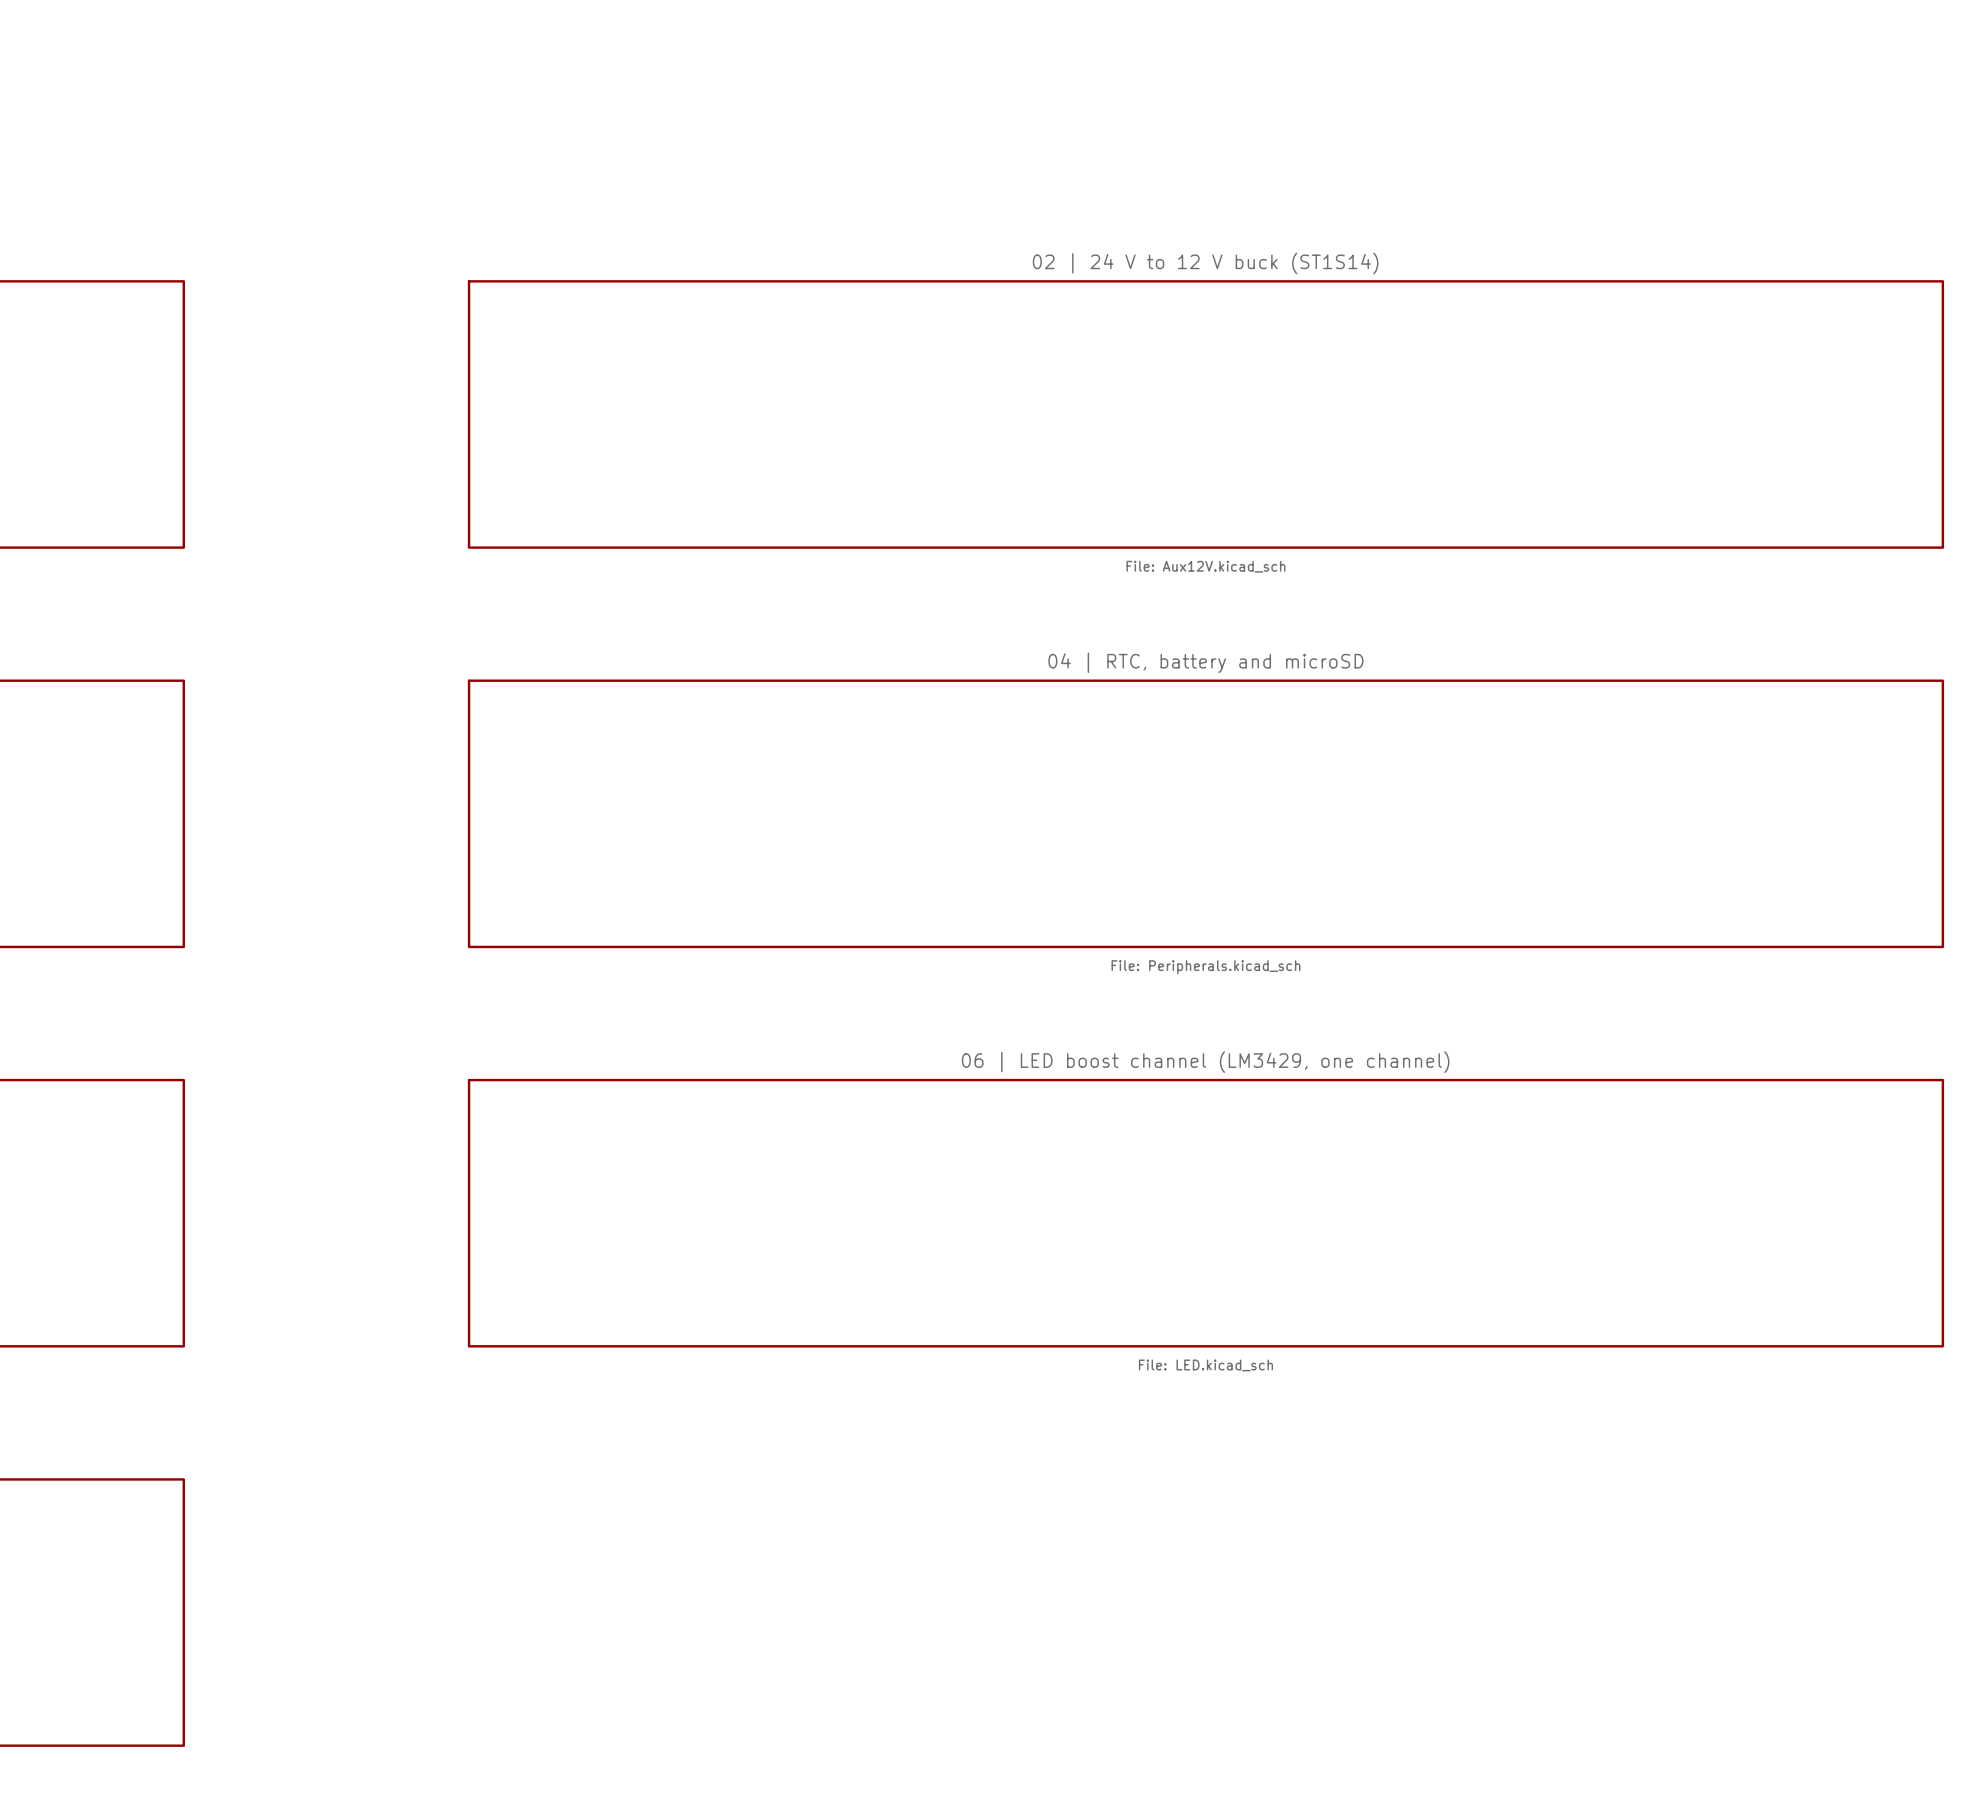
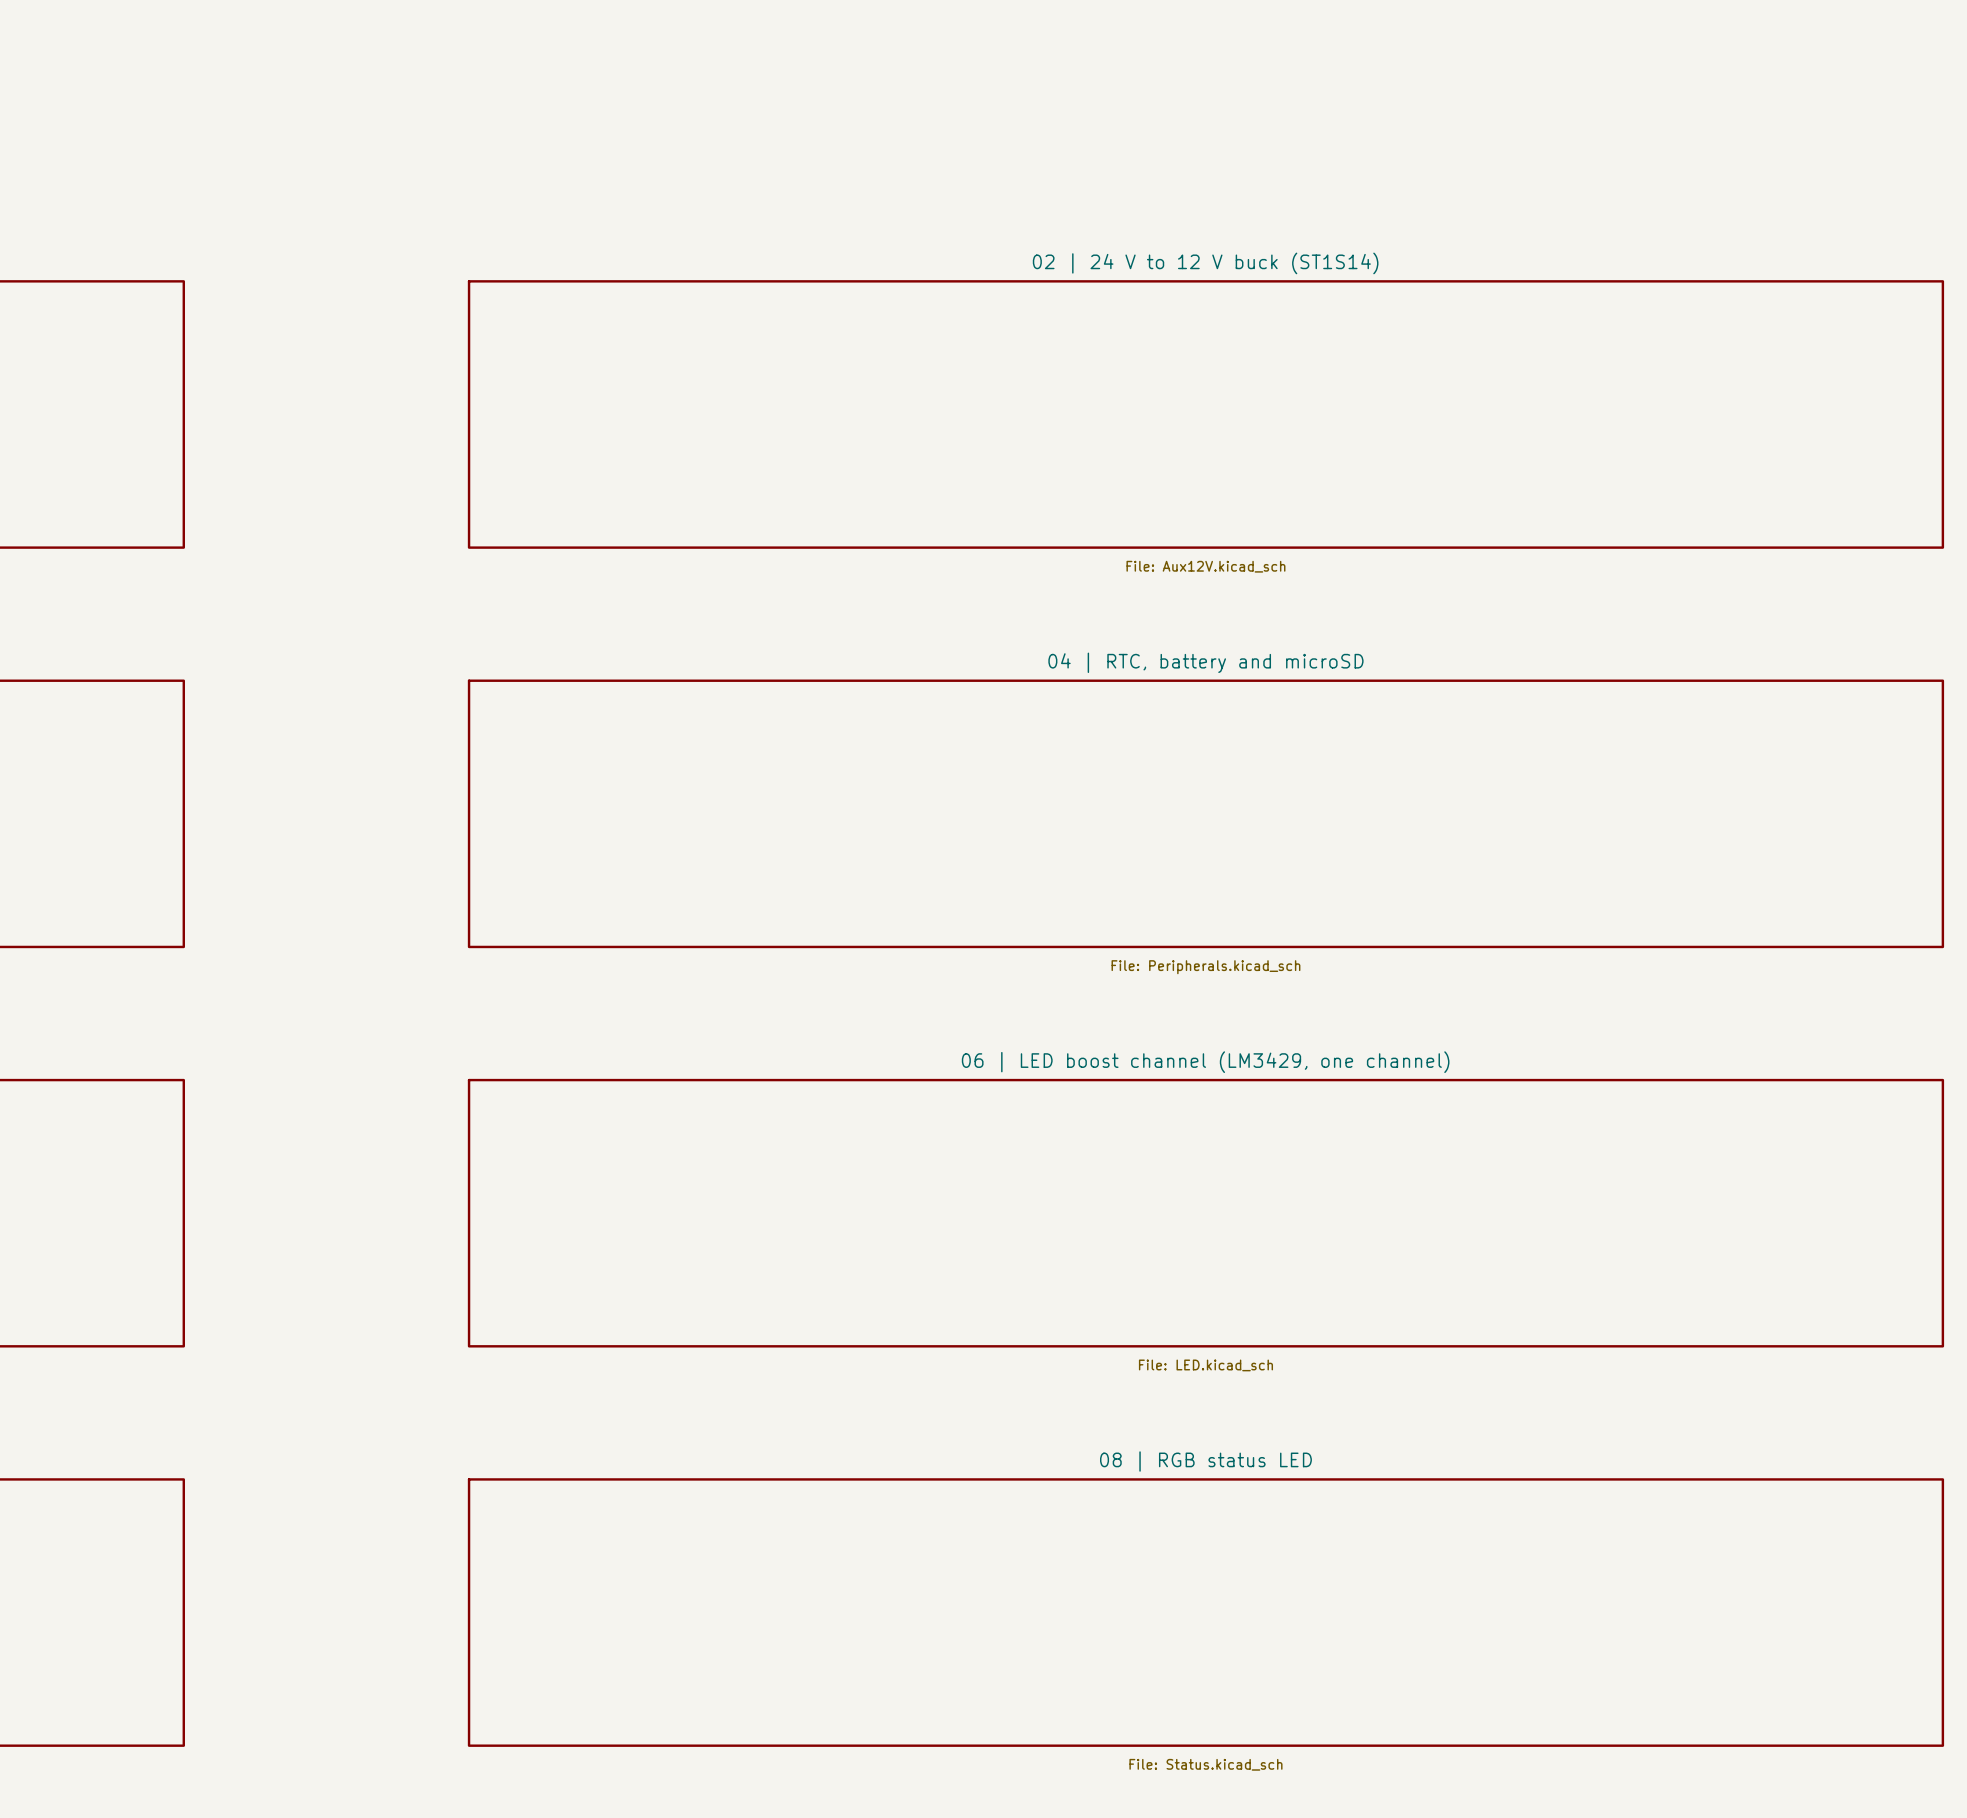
sheet 08 | RGB status LED: none -> File: Status.kicad_sch (1205, 1612)

